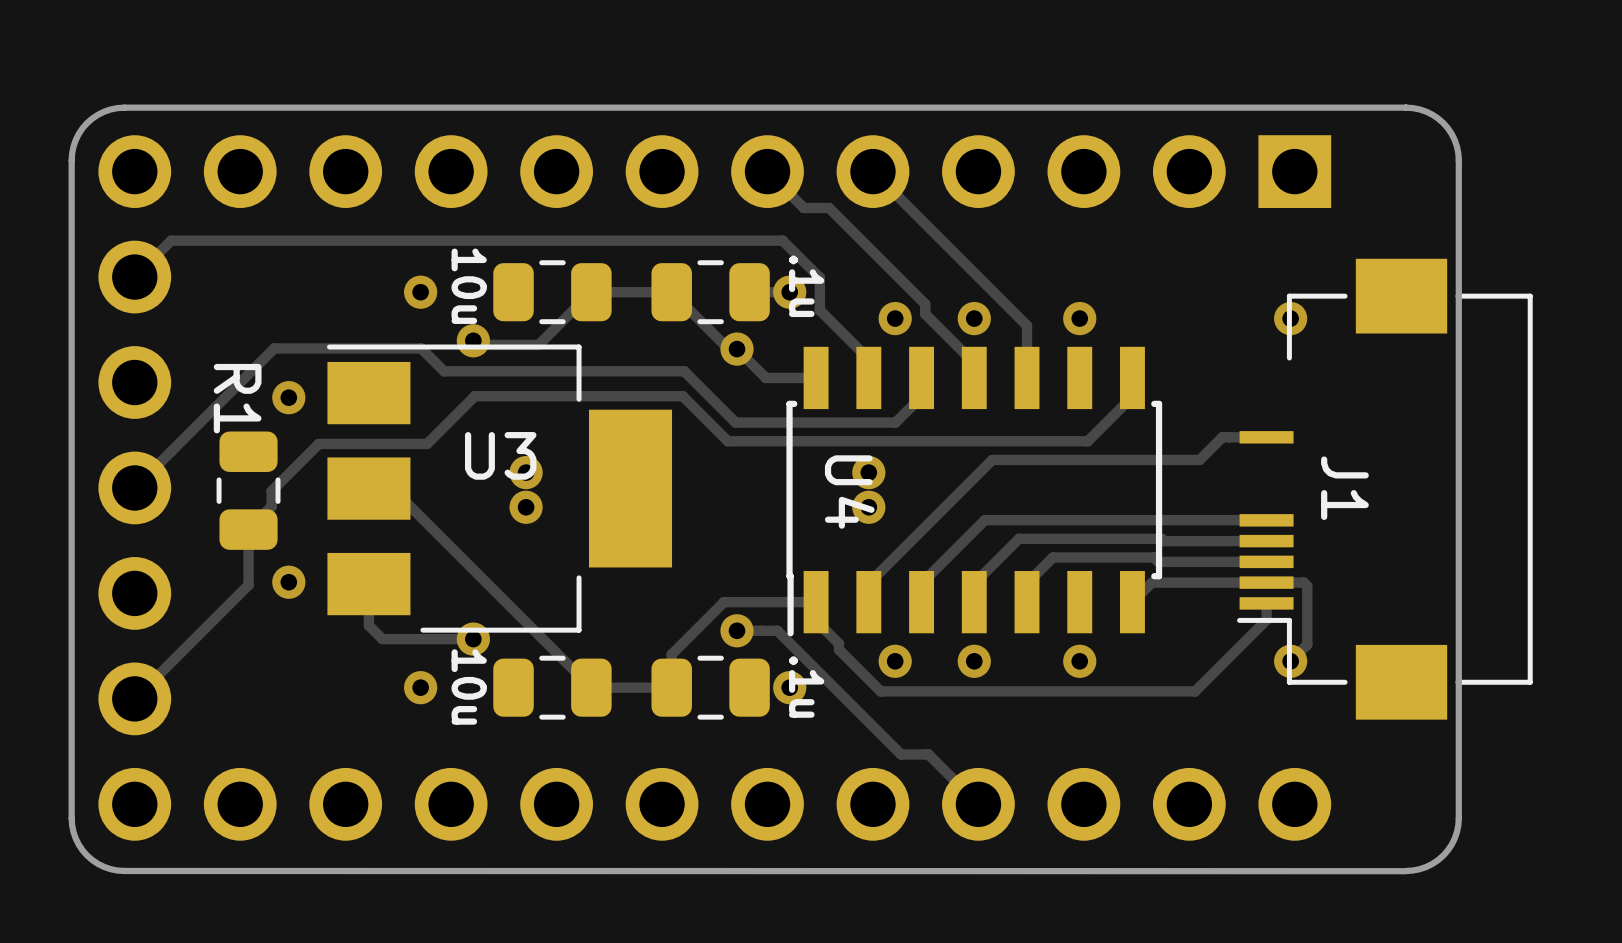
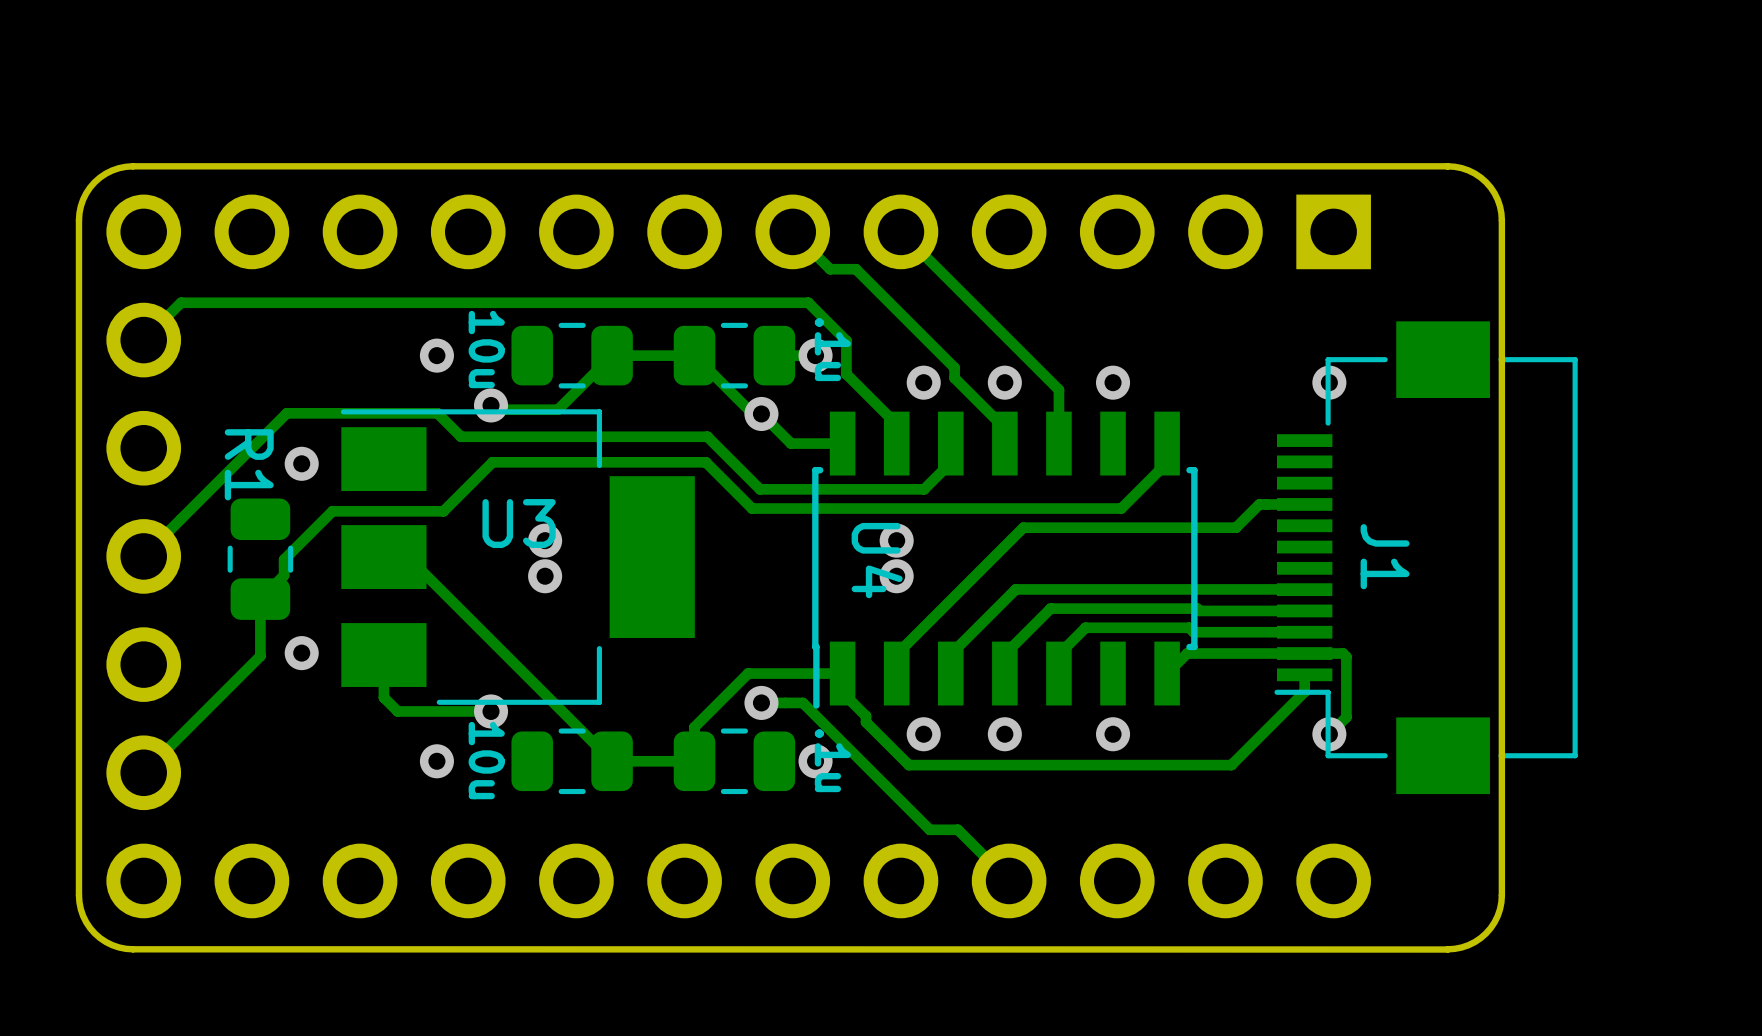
J1 footprint: [1237, 258, 1533, 720] -> [1274, 321, 1578, 795]

